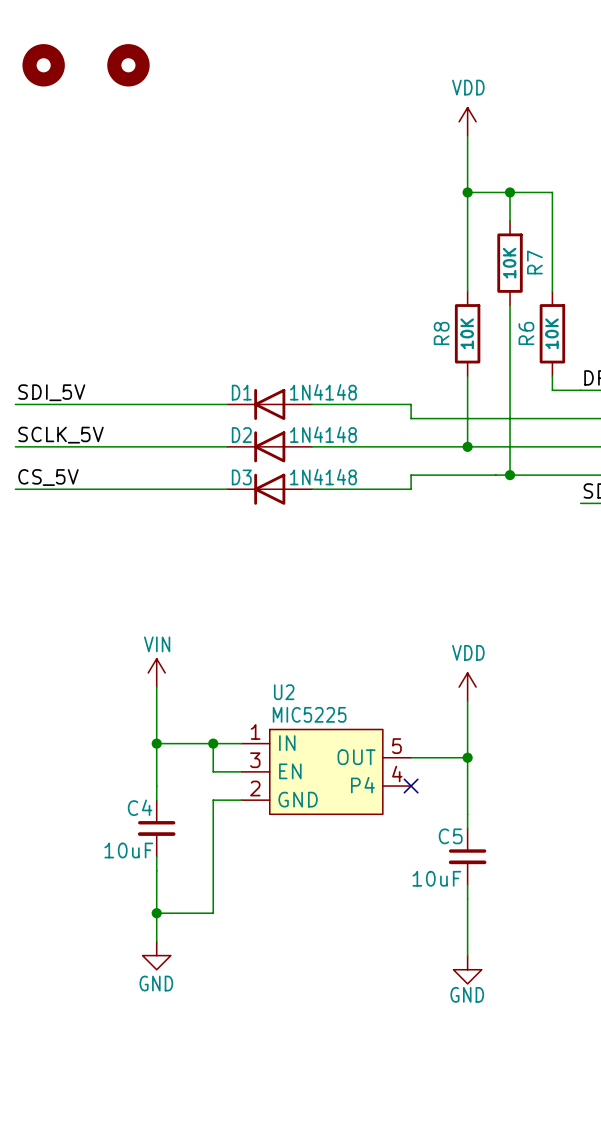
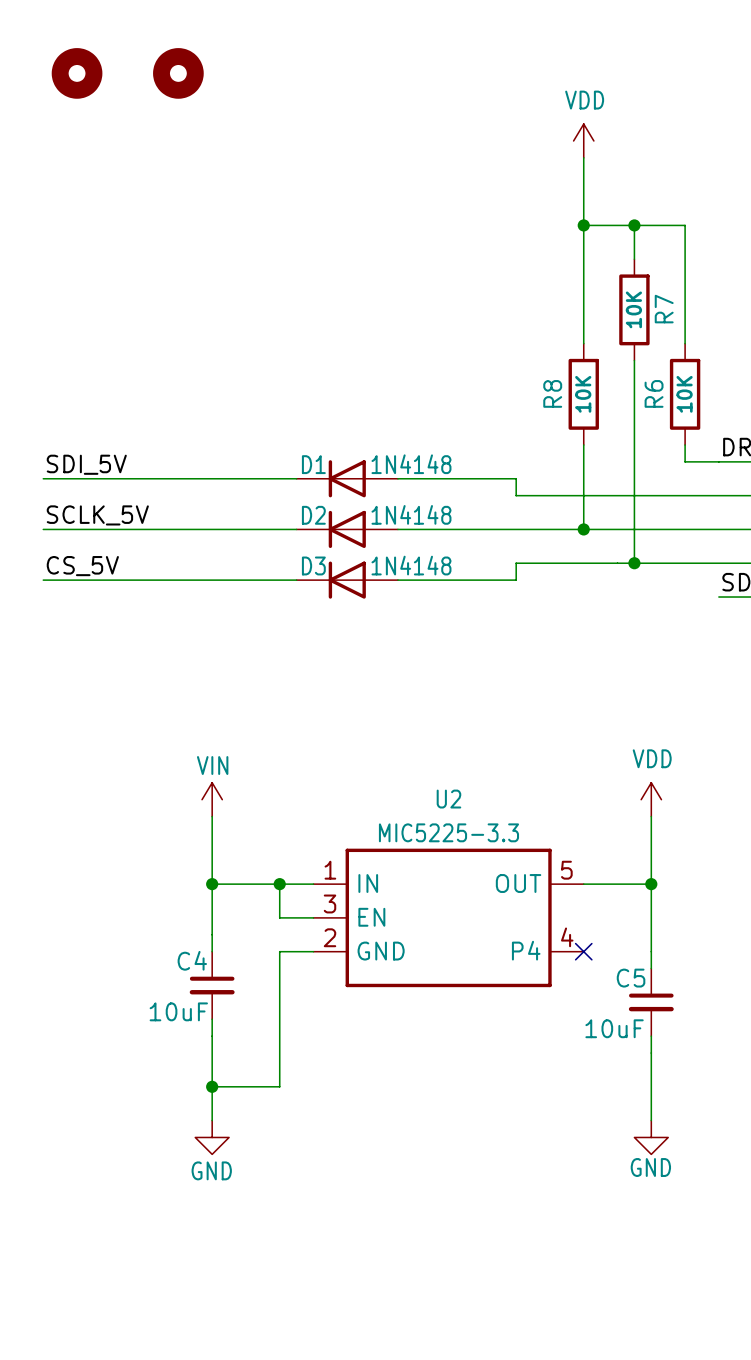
power symbol position: VDD (467, 687) -> VDD (651, 799)
U2 name position: U2 (284, 692) -> U2 (448, 799)
wire: (467, 701) (467, 828) -> (651, 816) (651, 968)
U2 value: MIC5225 (309, 714) -> MIC5225-3.3 (448, 832)
U2 symbol: [241, 729, 412, 815] -> [313, 848, 584, 988]
wire: (411, 757) (467, 757) -> (583, 884) (651, 884)
junction position: (467, 757) -> (651, 884)
no-connect mark position: (411, 786) -> (583, 951)
C5 position: (467, 856) -> (651, 1002)
wire: (467, 884) (467, 955) -> (651, 1036) (651, 1120)
power symbol position: GND (467, 969) -> GND (651, 1137)

